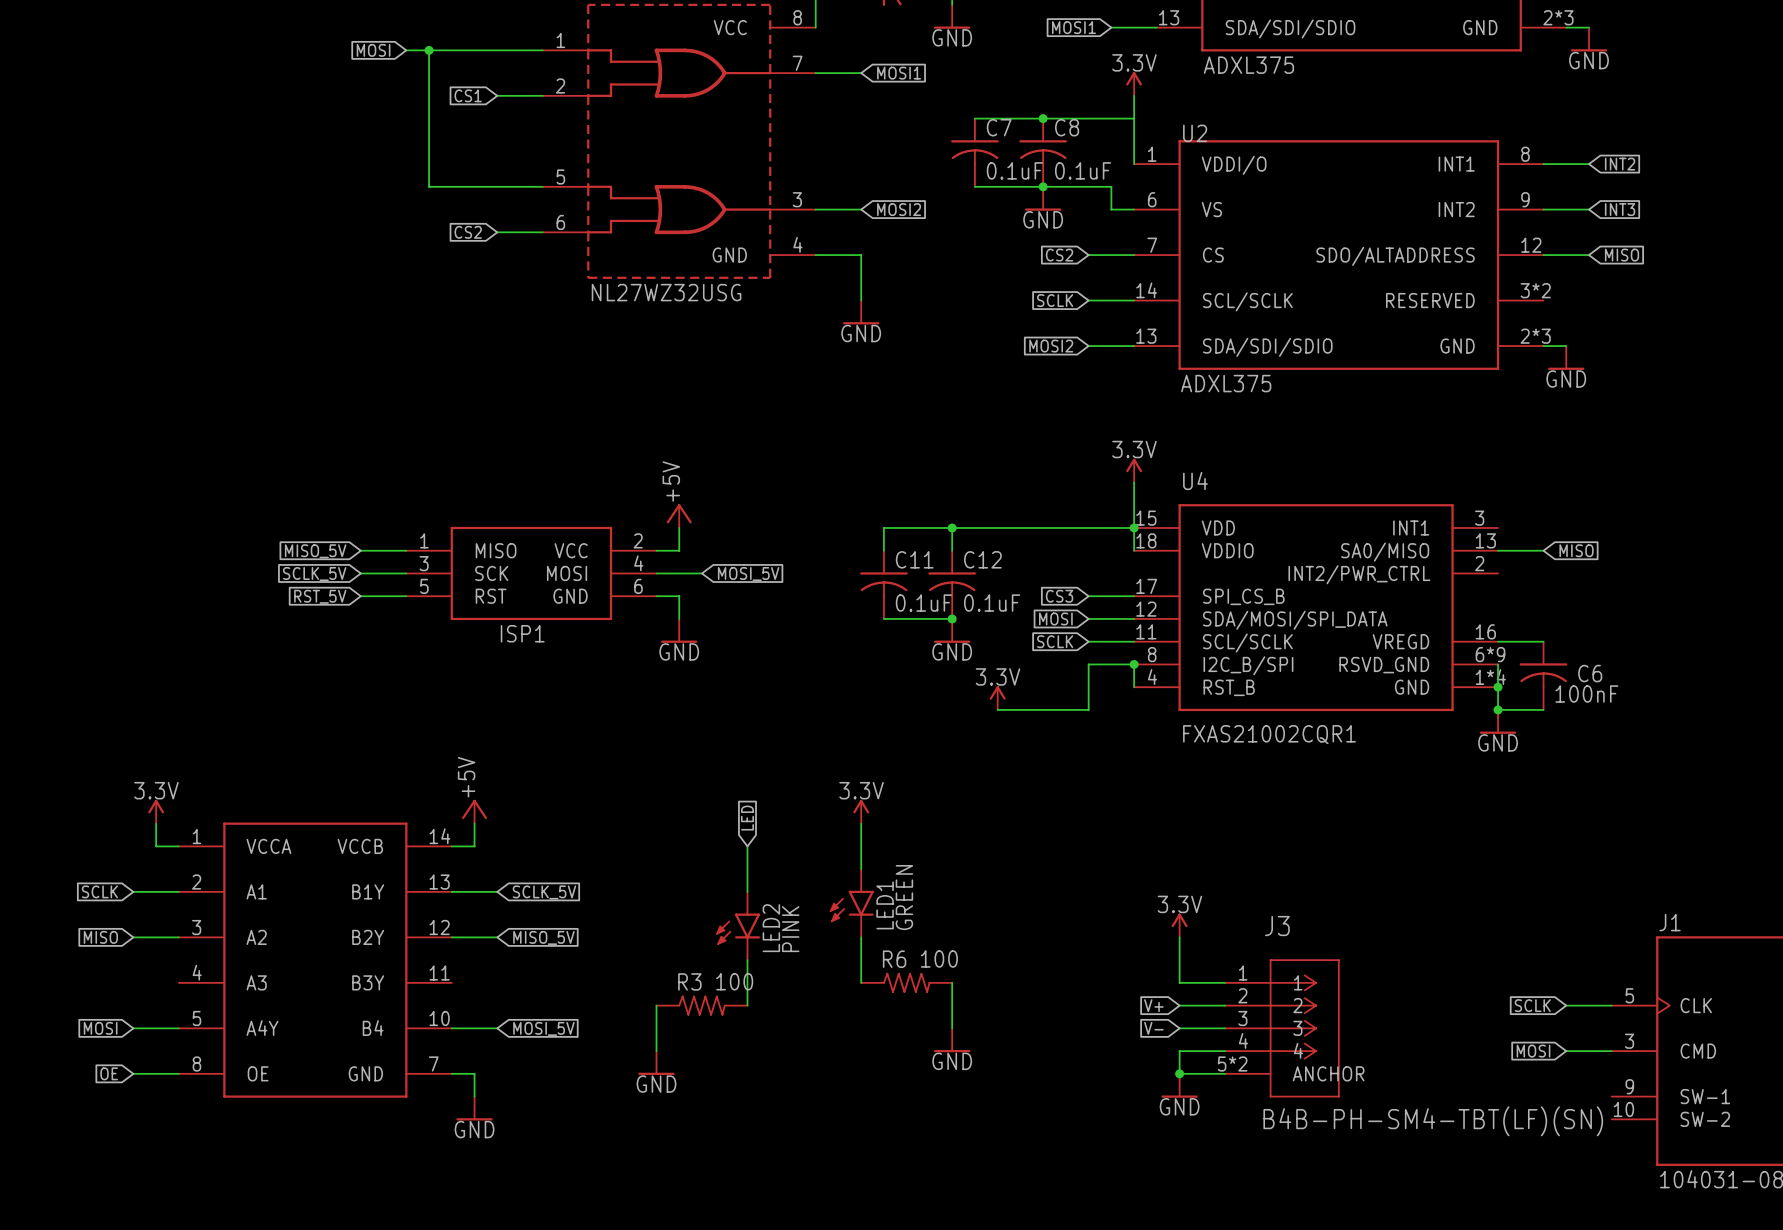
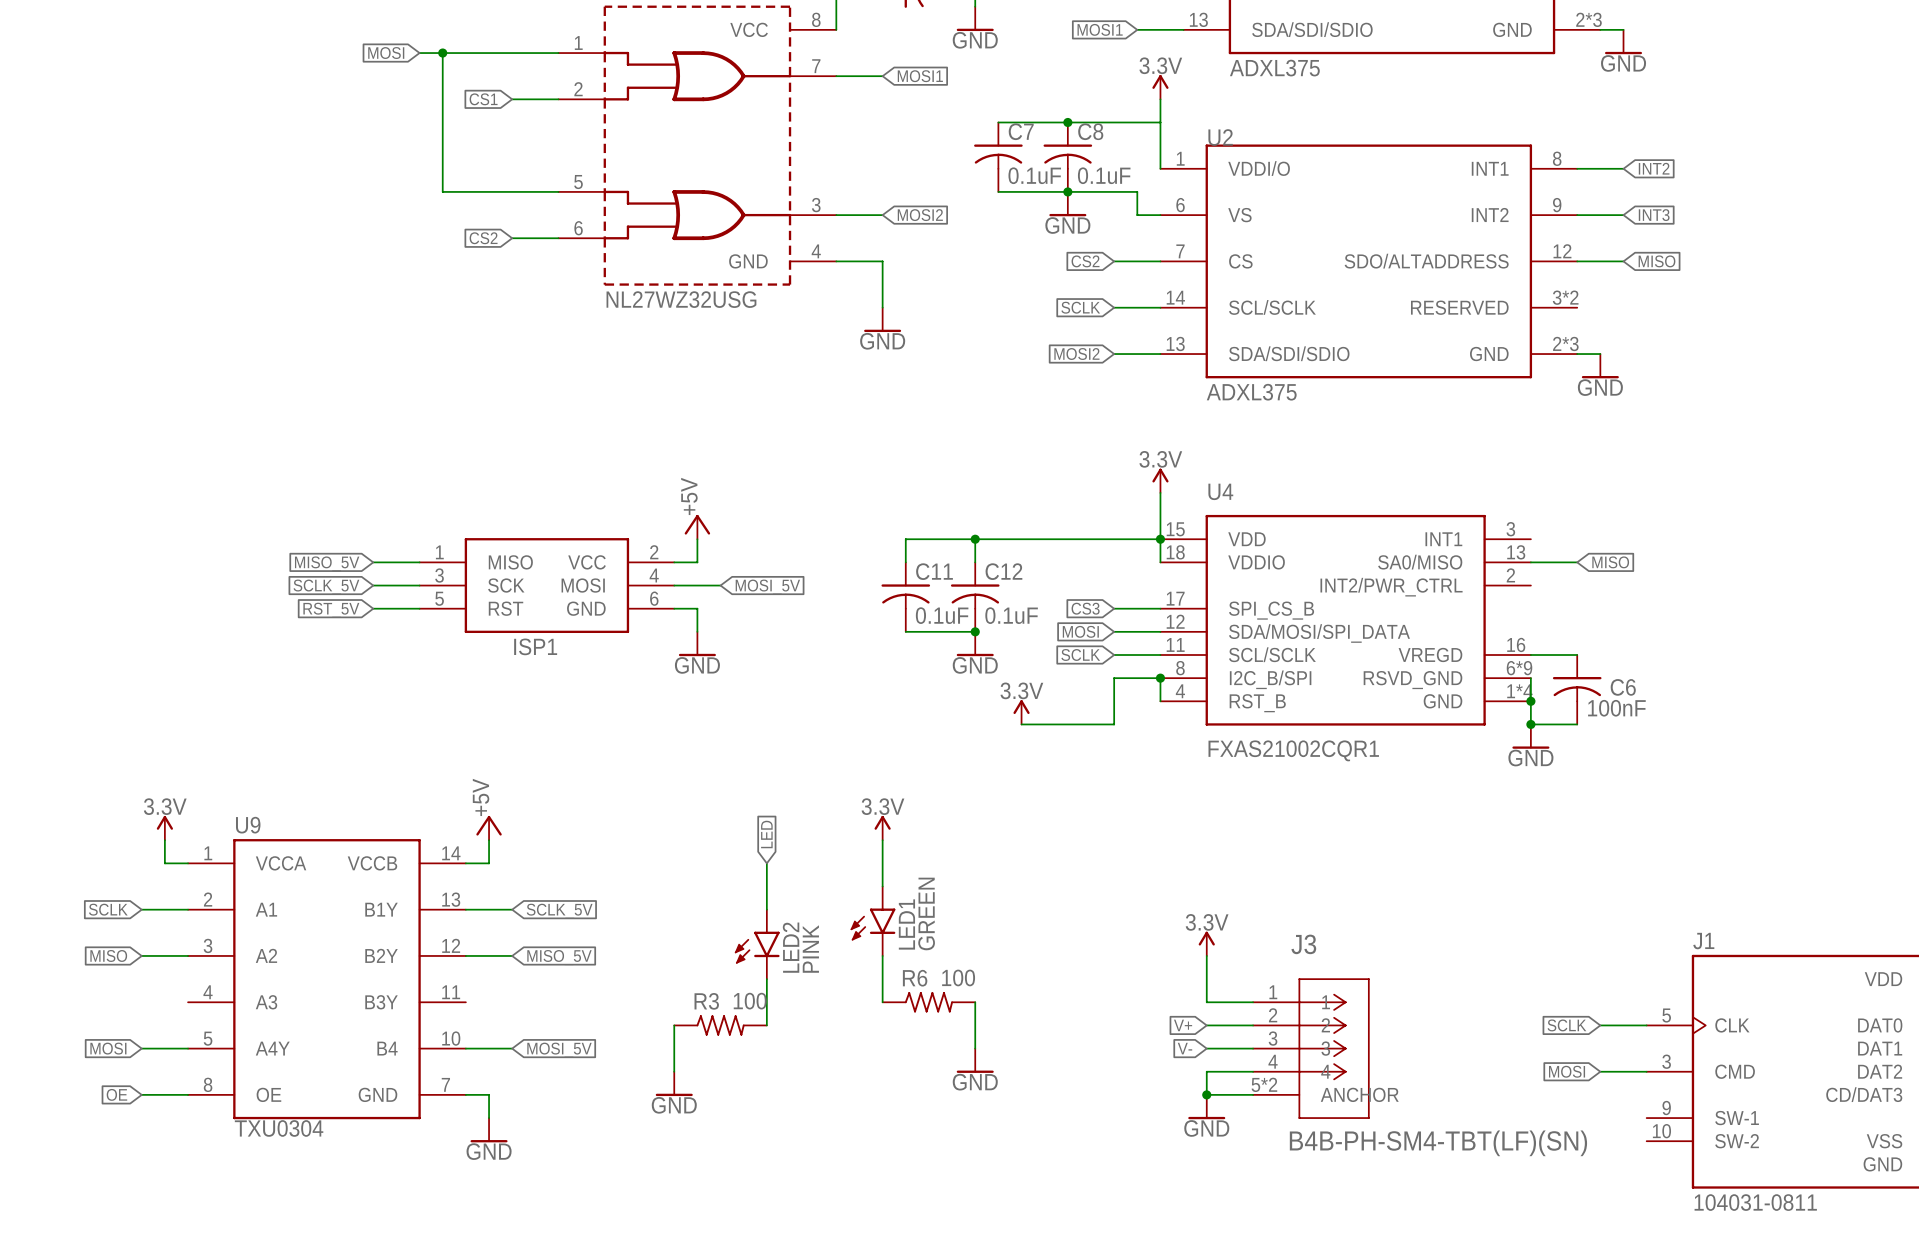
U9 name: none -> U9 (248, 825)
U9 value: none -> TXU0304 (279, 1128)

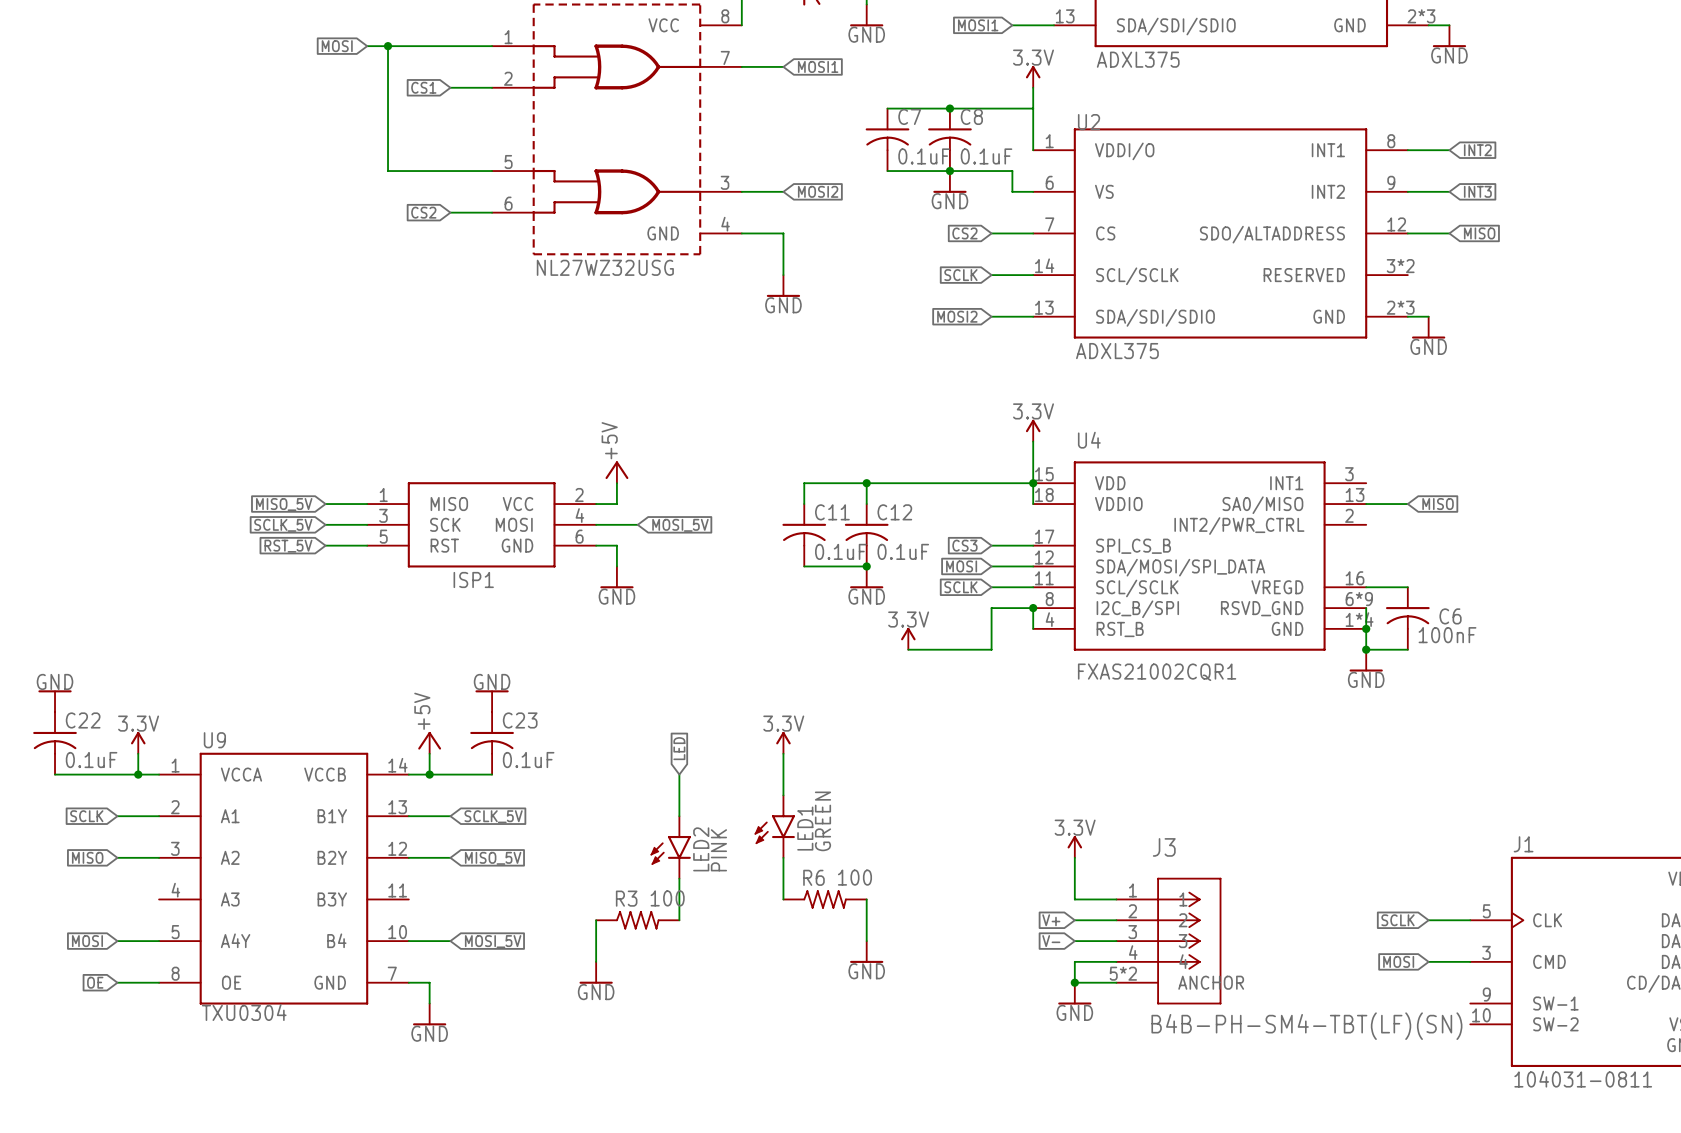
power symbol: none -> GND (55, 701)
power symbol: none -> GND (492, 701)
C22: none -> 0.1uF (55, 743)
C23: none -> 0.1uF (492, 743)
wire: none -> (55, 774) (138, 774)
junction: none -> (138, 774)
wire: none -> (429, 774) (492, 774)
junction: none -> (429, 774)

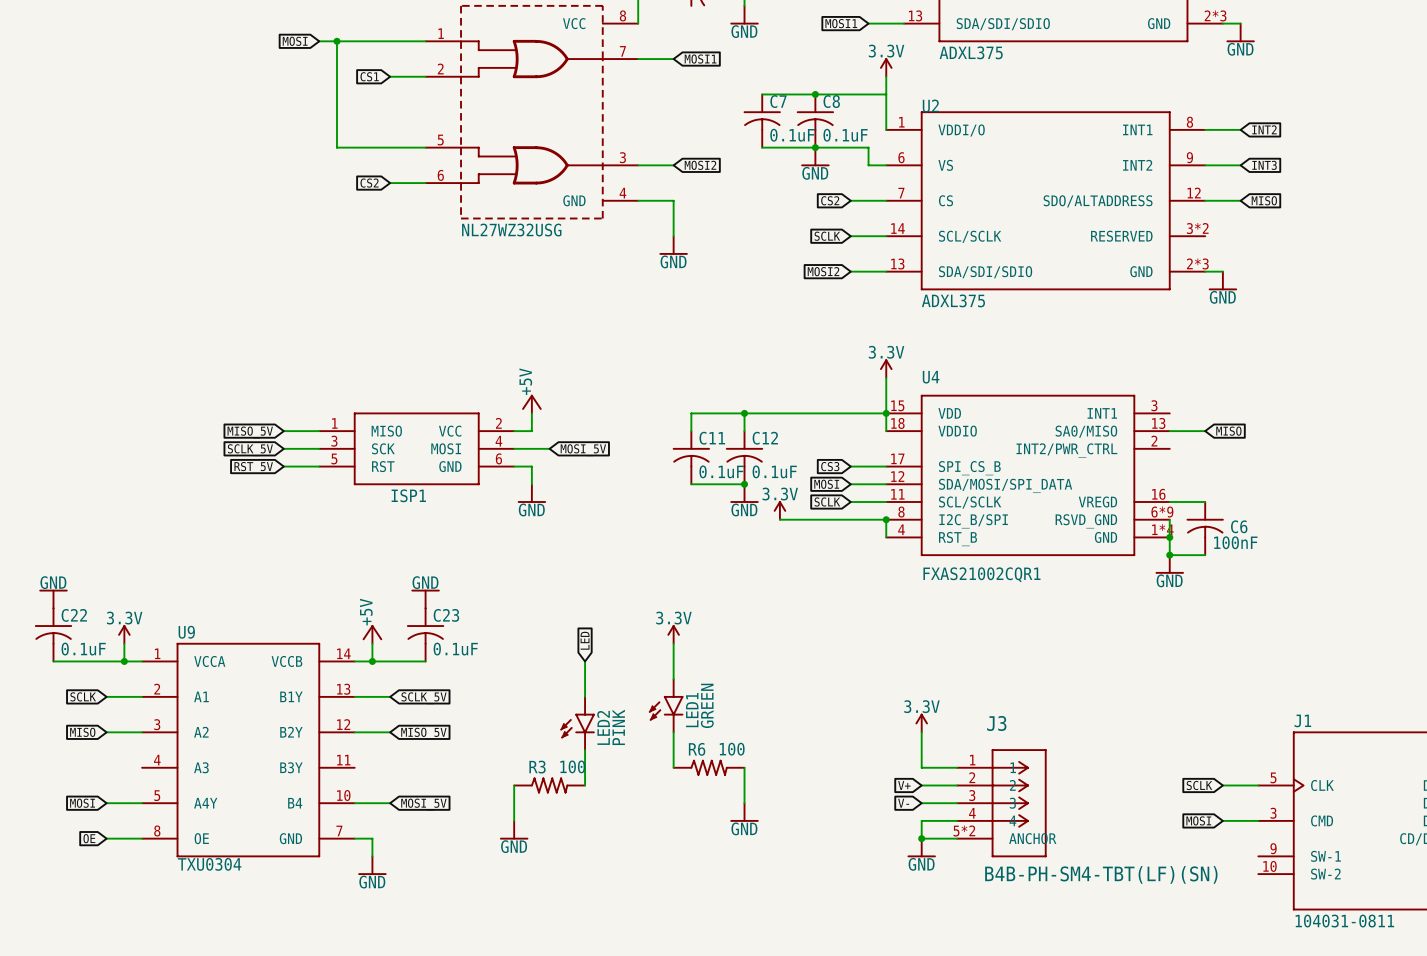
wire: (991, 608) (991, 649) (908, 649) -> (850, 519) (779, 519)
power symbol position: 3.3V (908, 638) -> 3.3V (779, 510)

